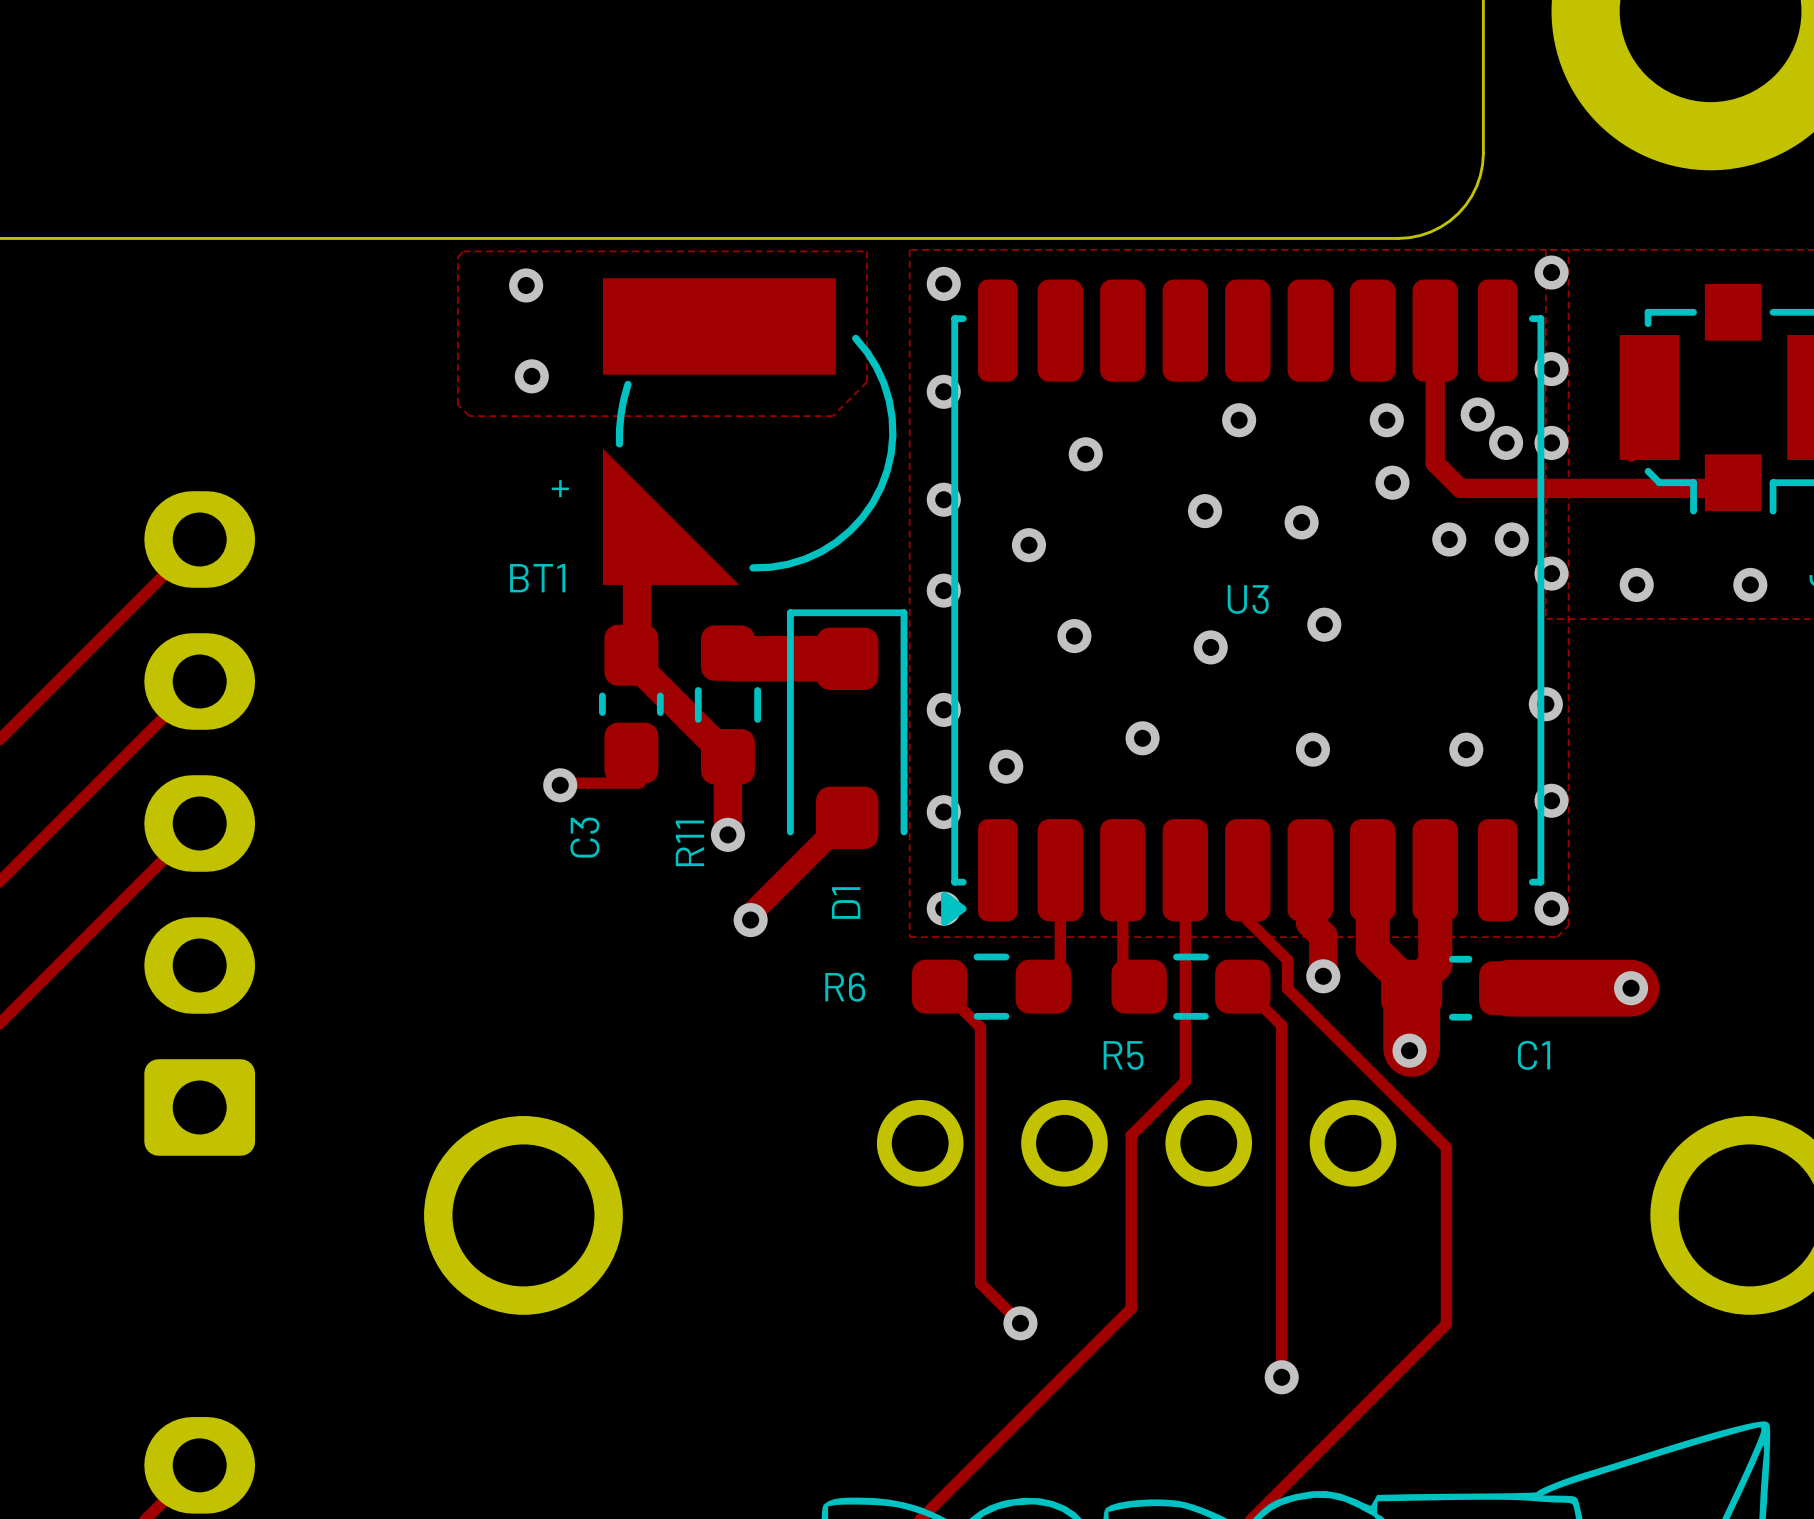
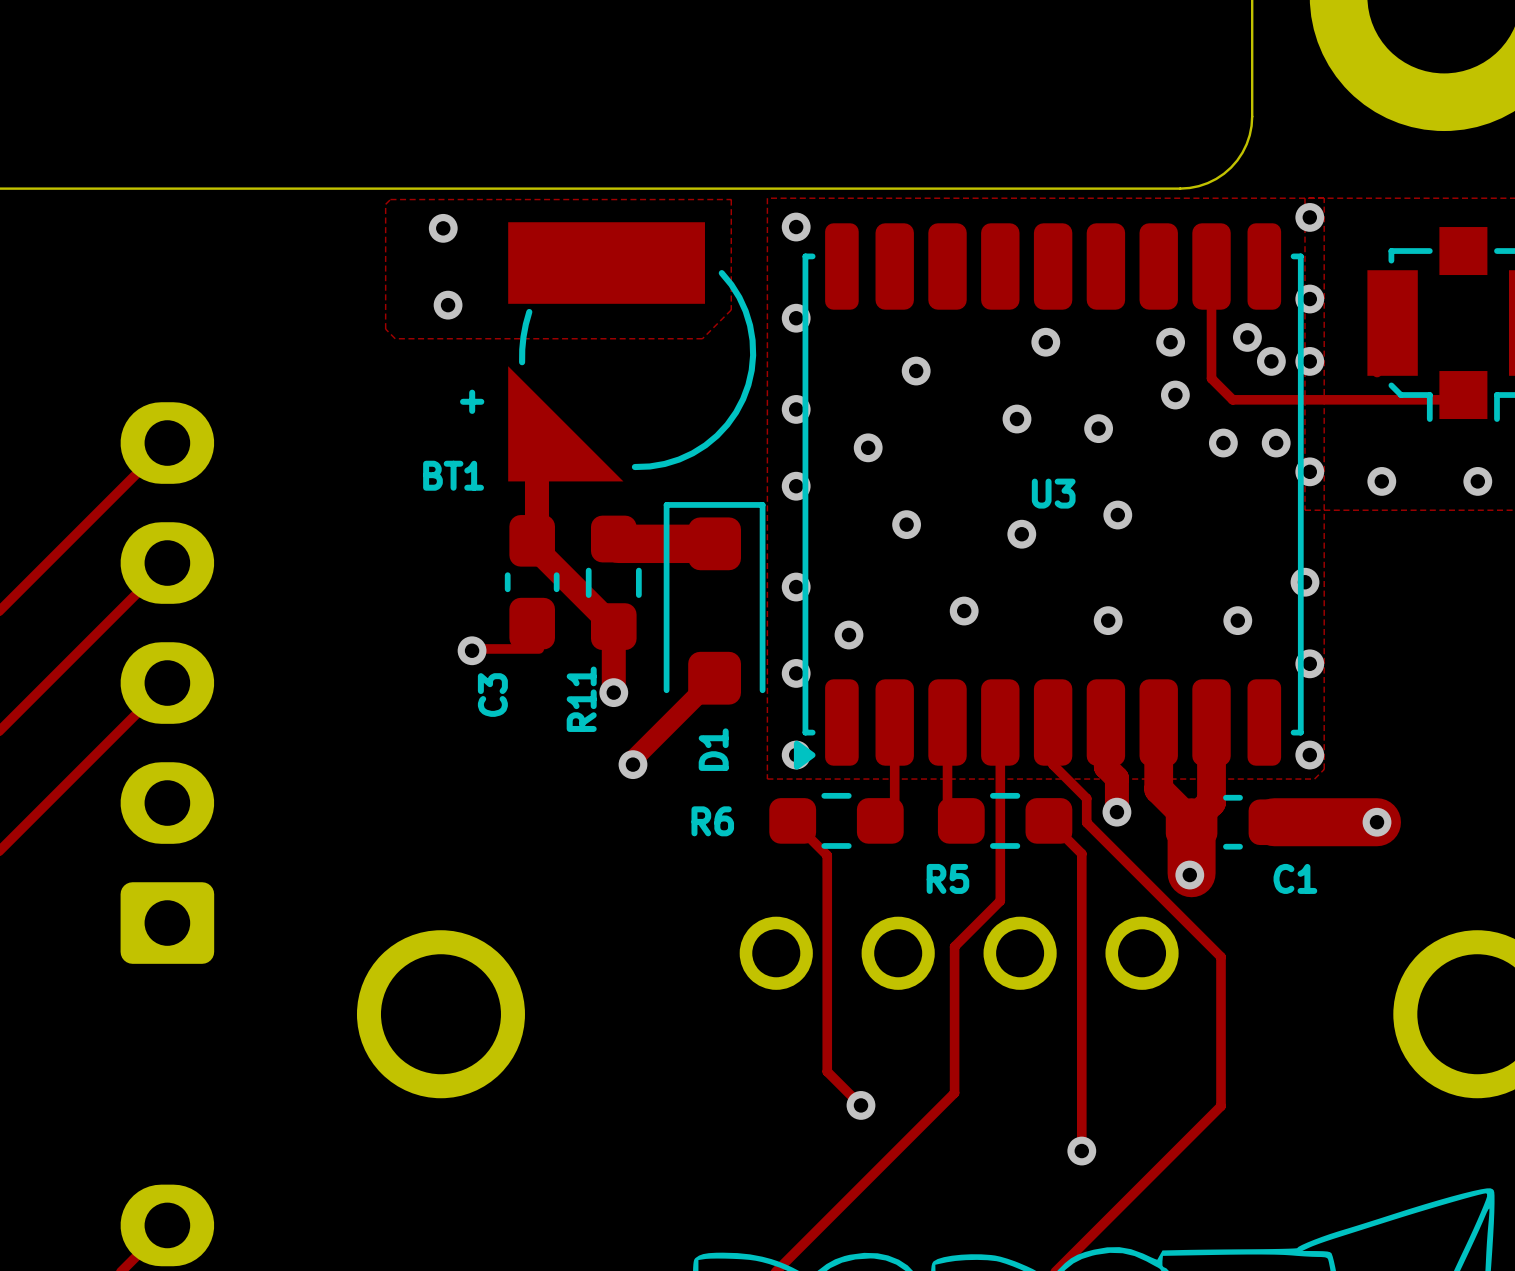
track width: thick (1435, 330) (1435, 463) (1460, 488) (1737, 488) -> thin (1211, 266) (1211, 378) (1232, 399) (1467, 399)

